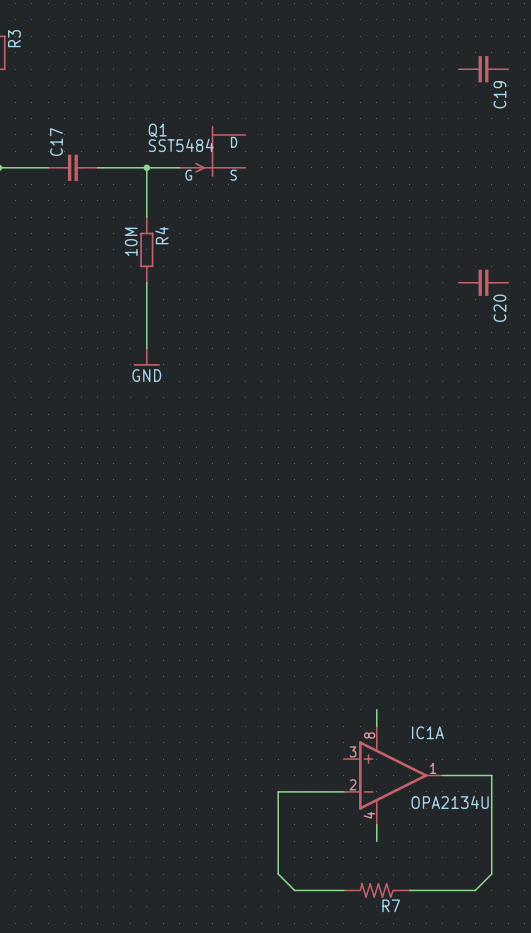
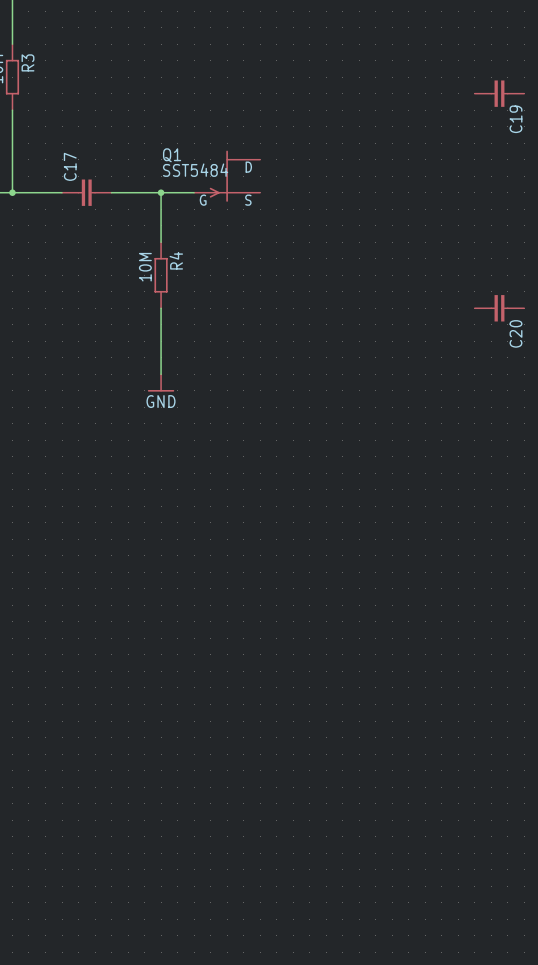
wire: (376, 709) (376, 726) -> none
IC1A: OPA2134U (393, 775) -> none
wire: (442, 775) (491, 775) (491, 874) (475, 890) (409, 890) -> none
wire: (343, 791) (278, 791) (278, 874) (294, 890) (343, 890) -> none
wire: (376, 824) (376, 841) -> none
R7: (376, 890) -> none

